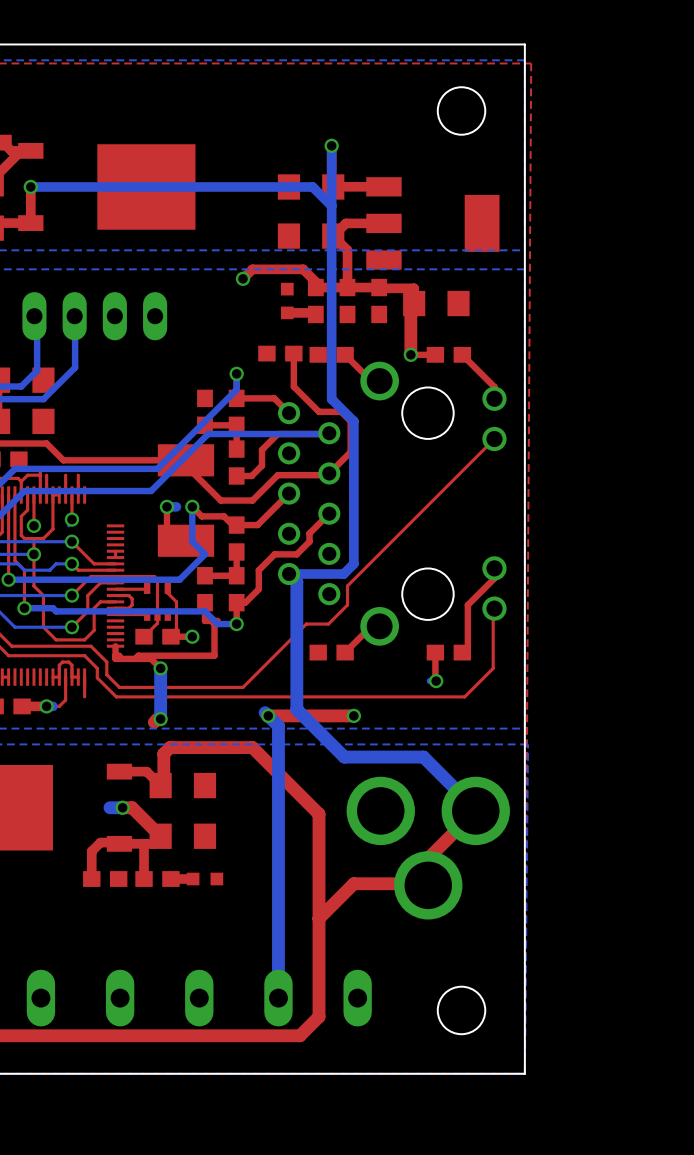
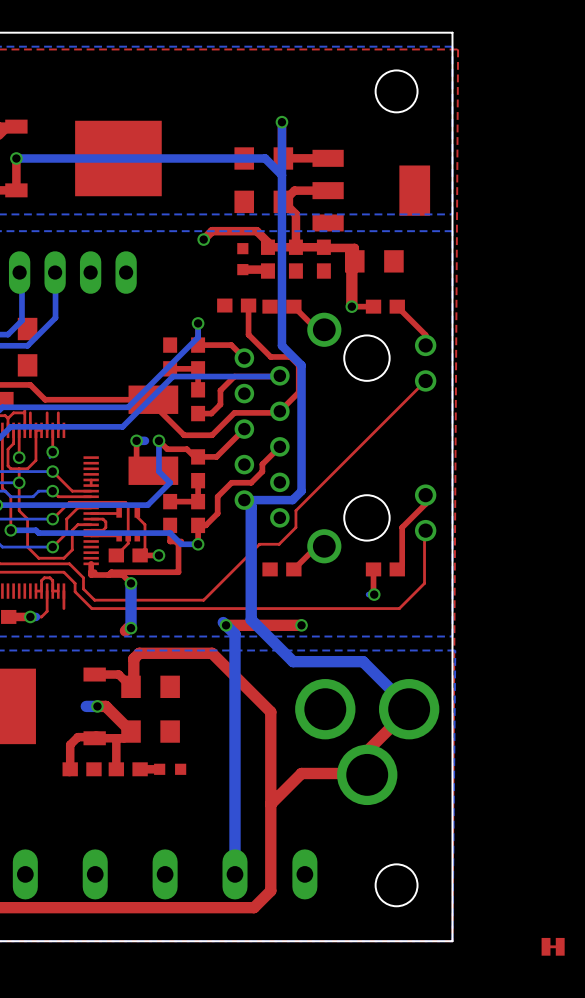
part: none -> (553, 946)

